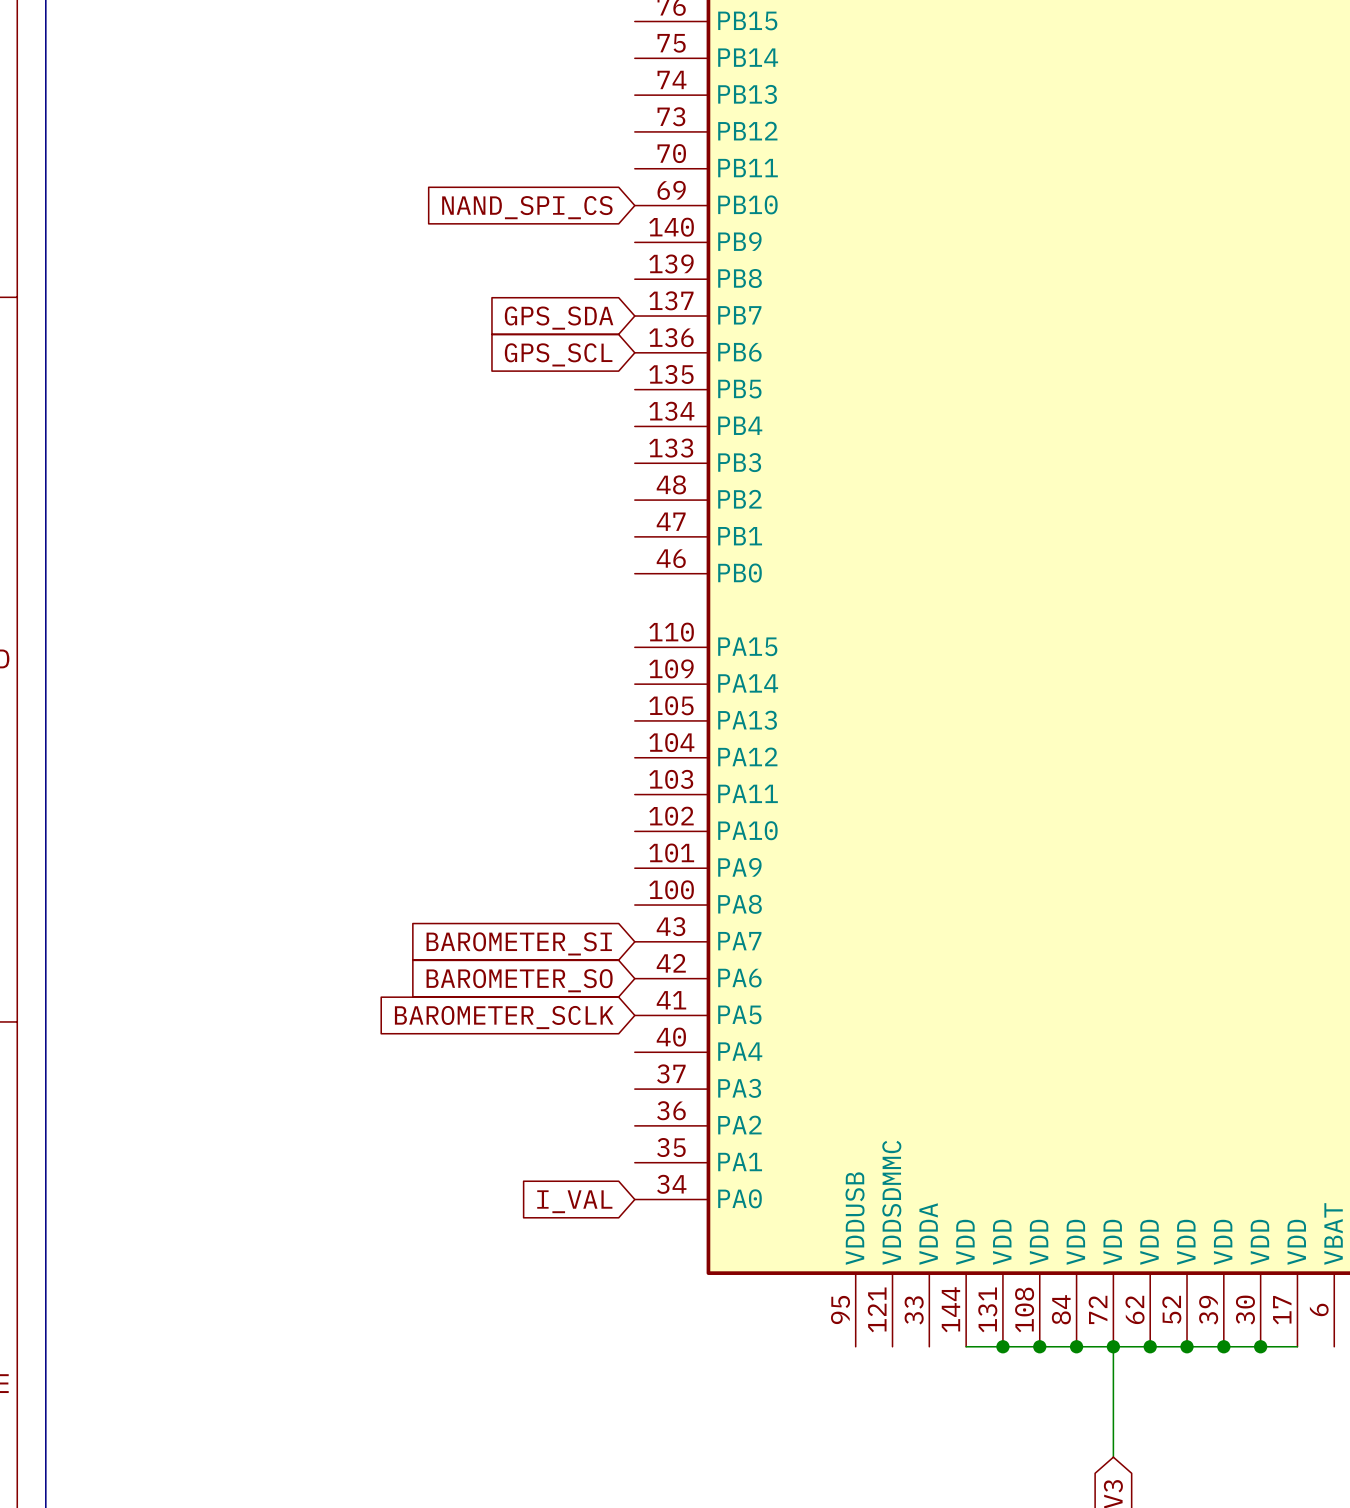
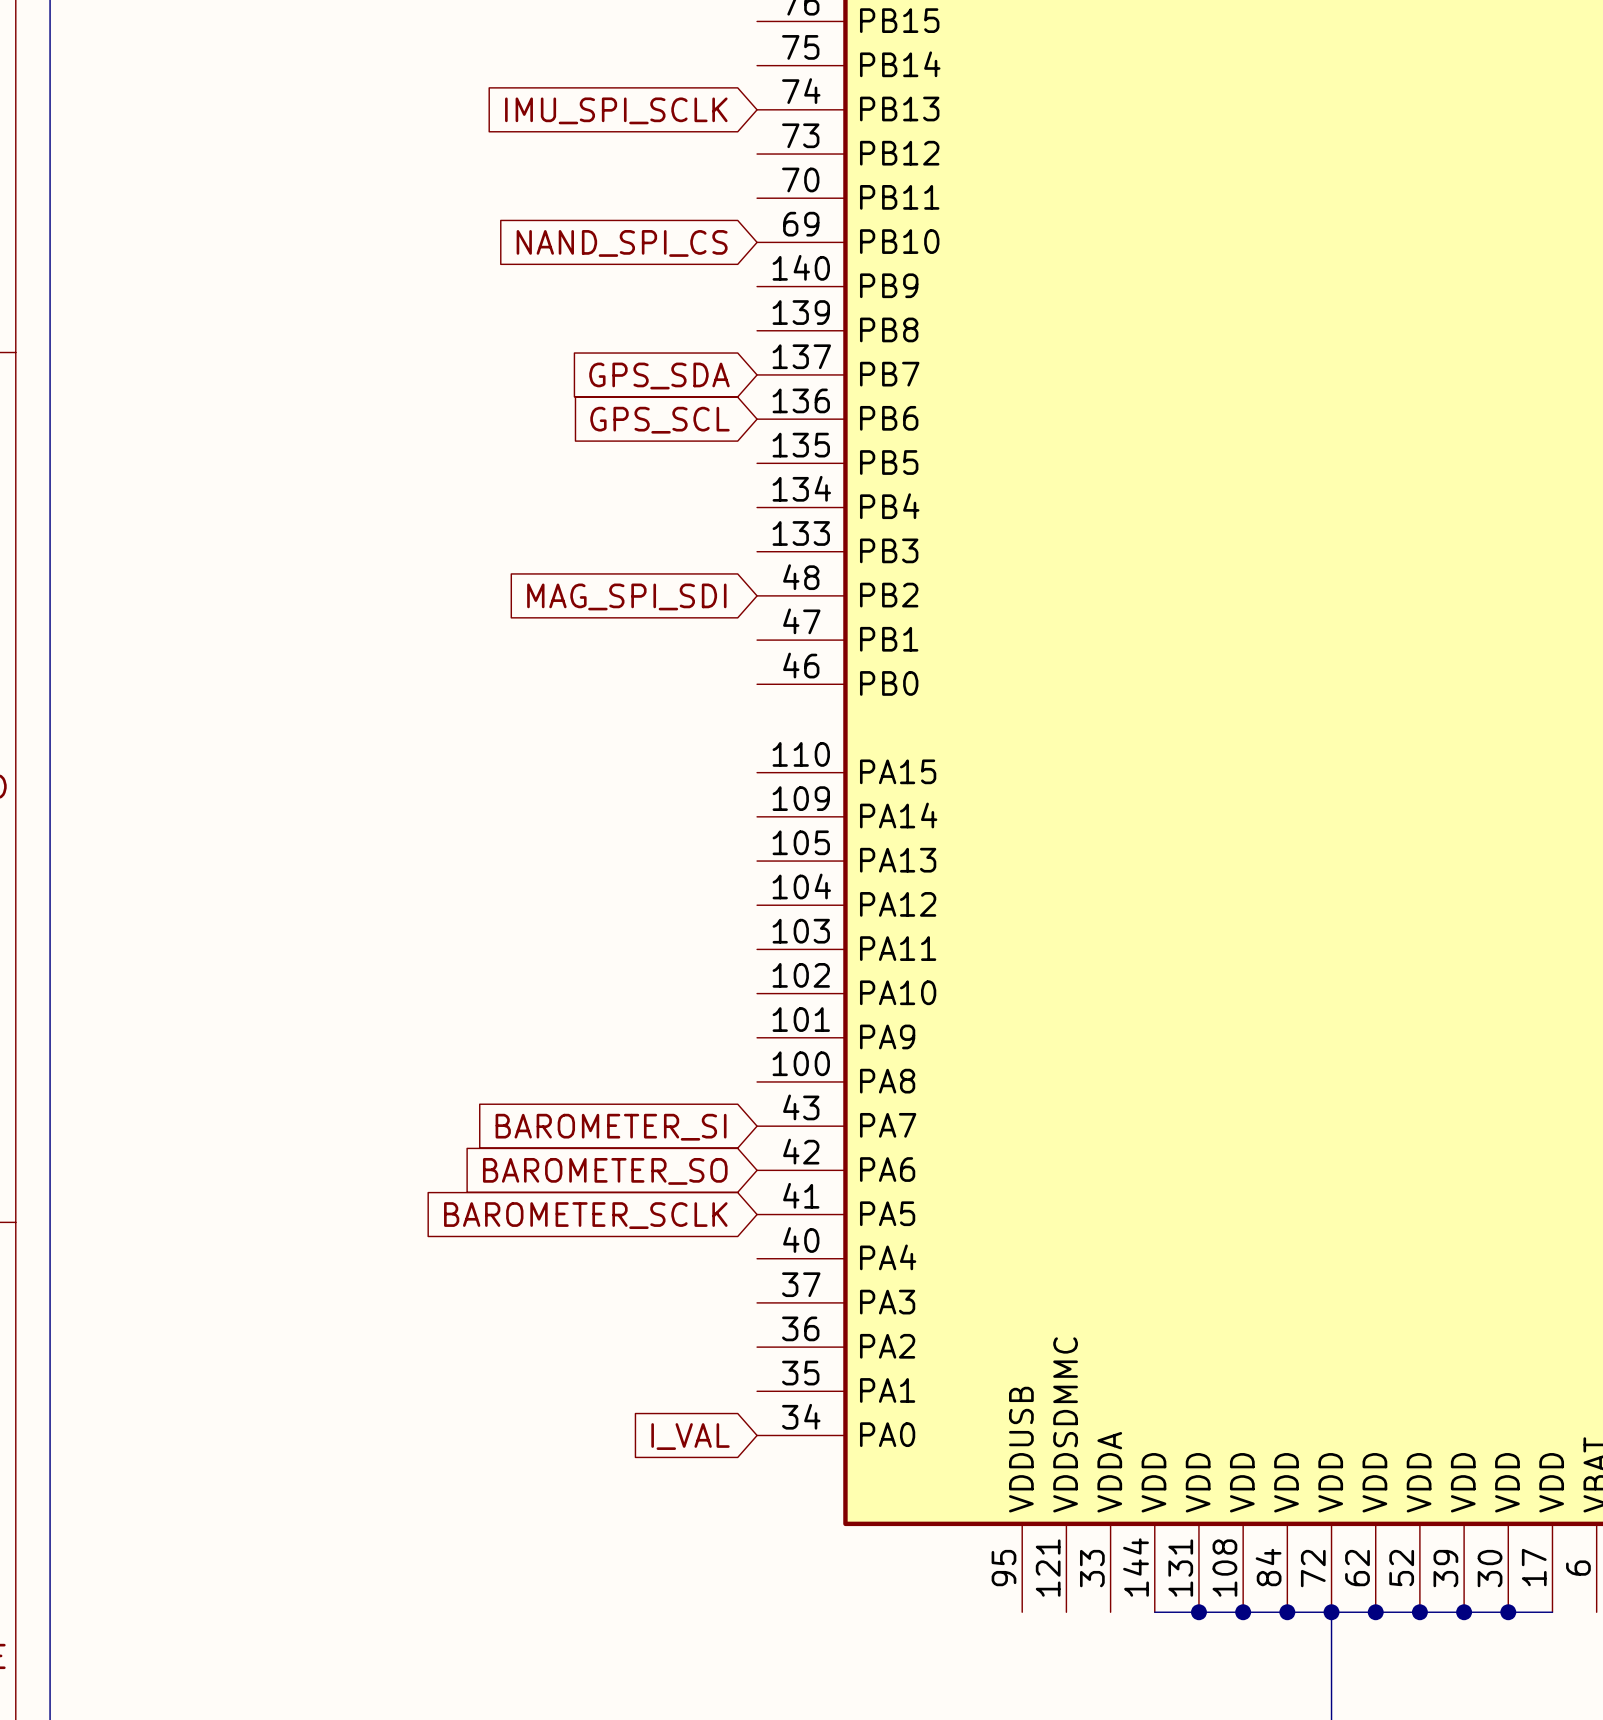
global label: none -> IMU_SPI_SCLK (616, 110)
global label: none -> MAG_SPI_SDI (626, 596)

